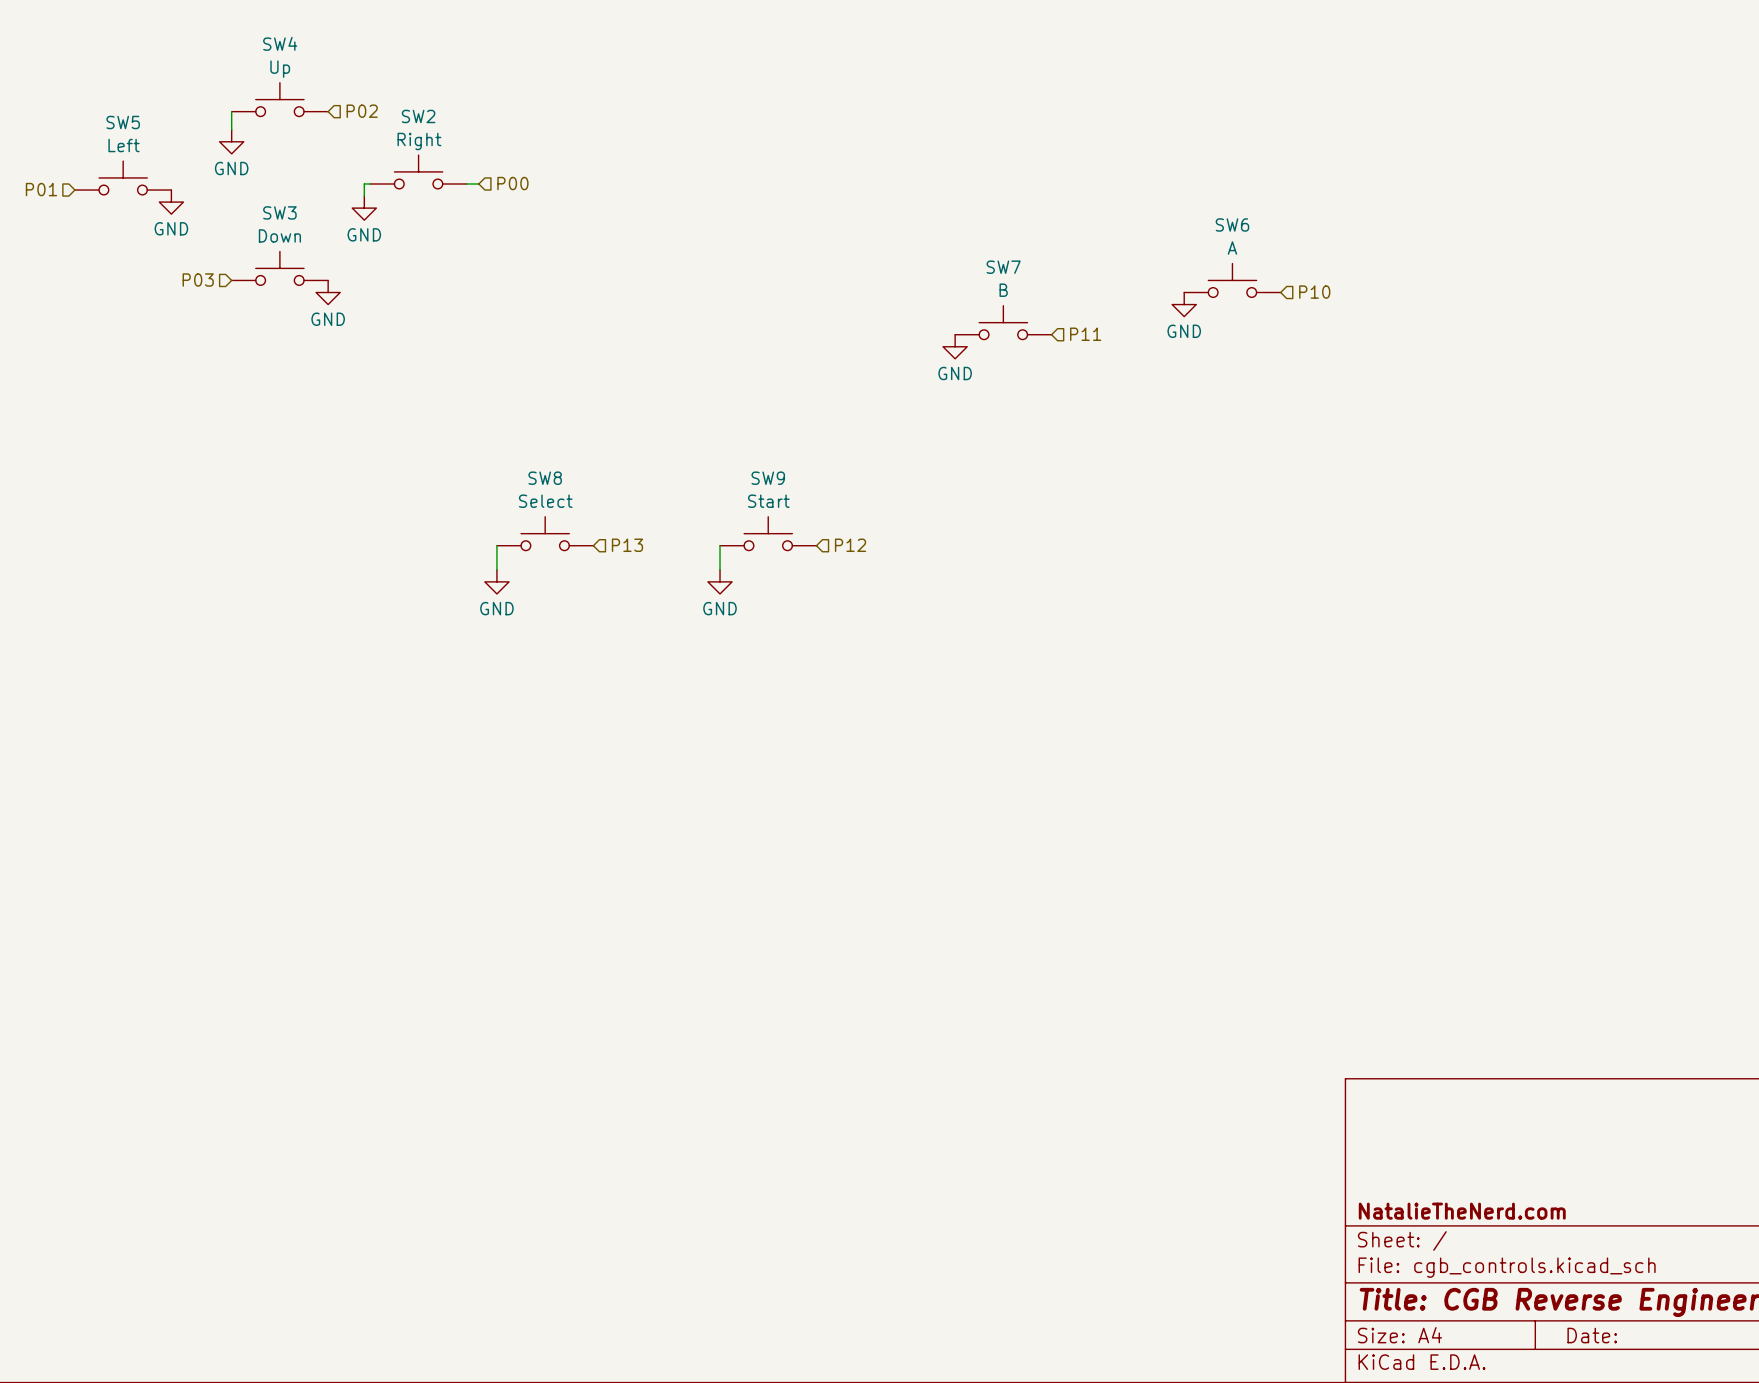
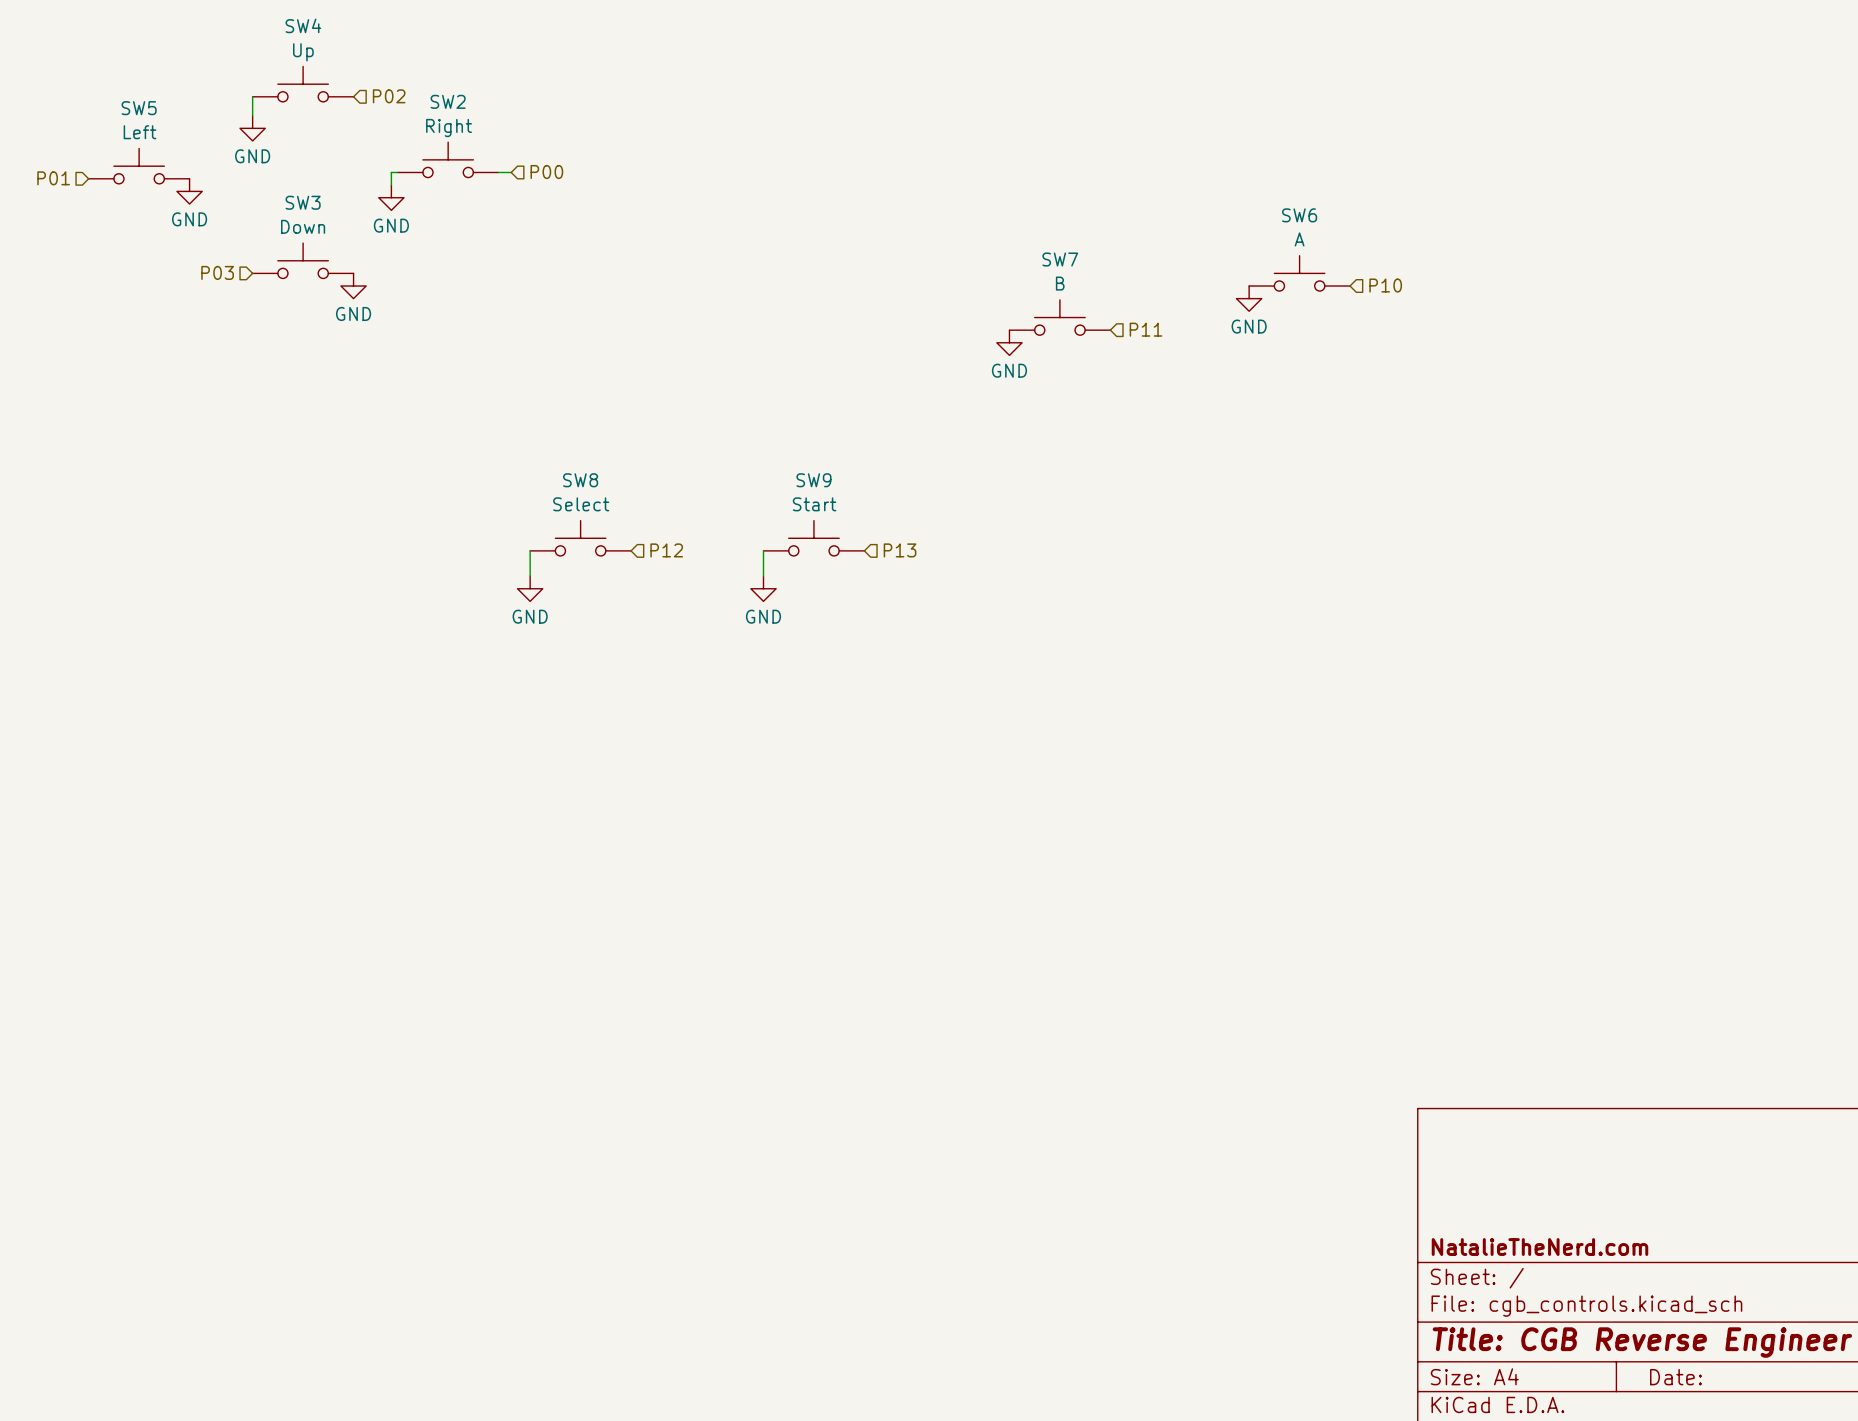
hierarchical label: P13 (627, 545) -> P12 (666, 550)
hierarchical label: P12 (850, 545) -> P13 (900, 550)

